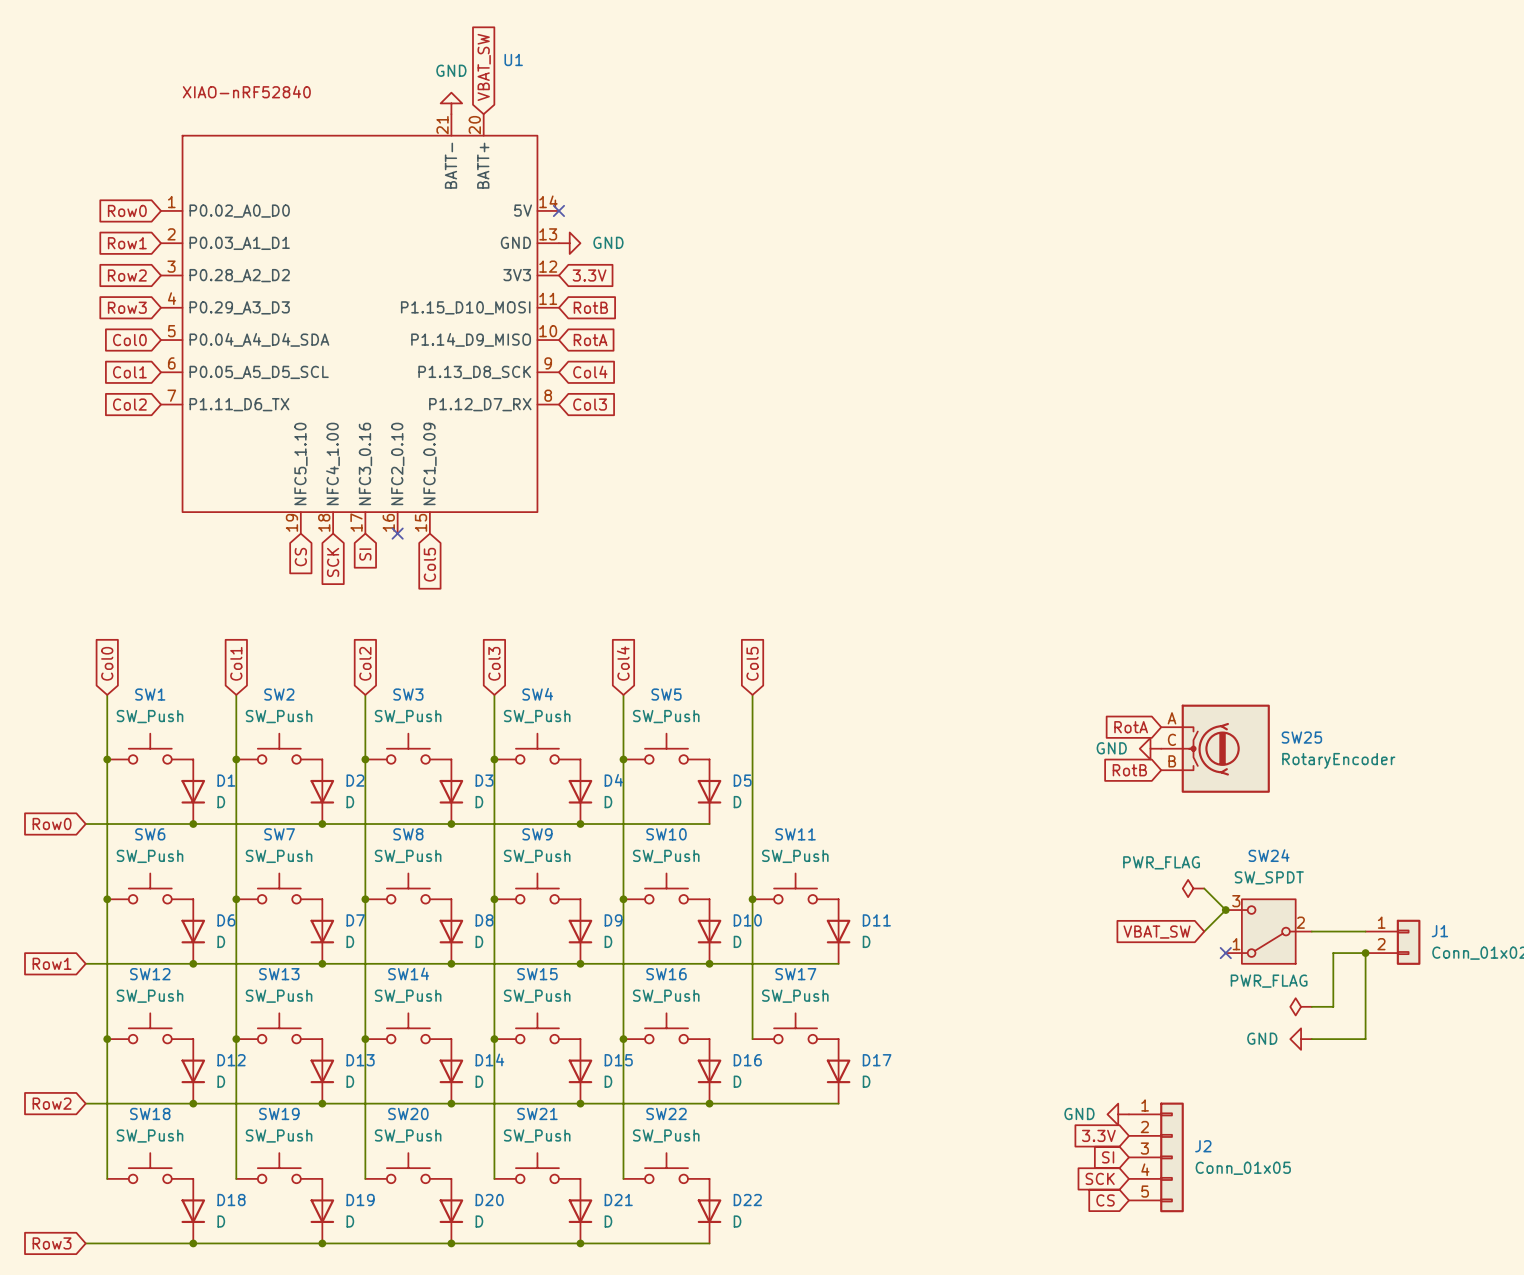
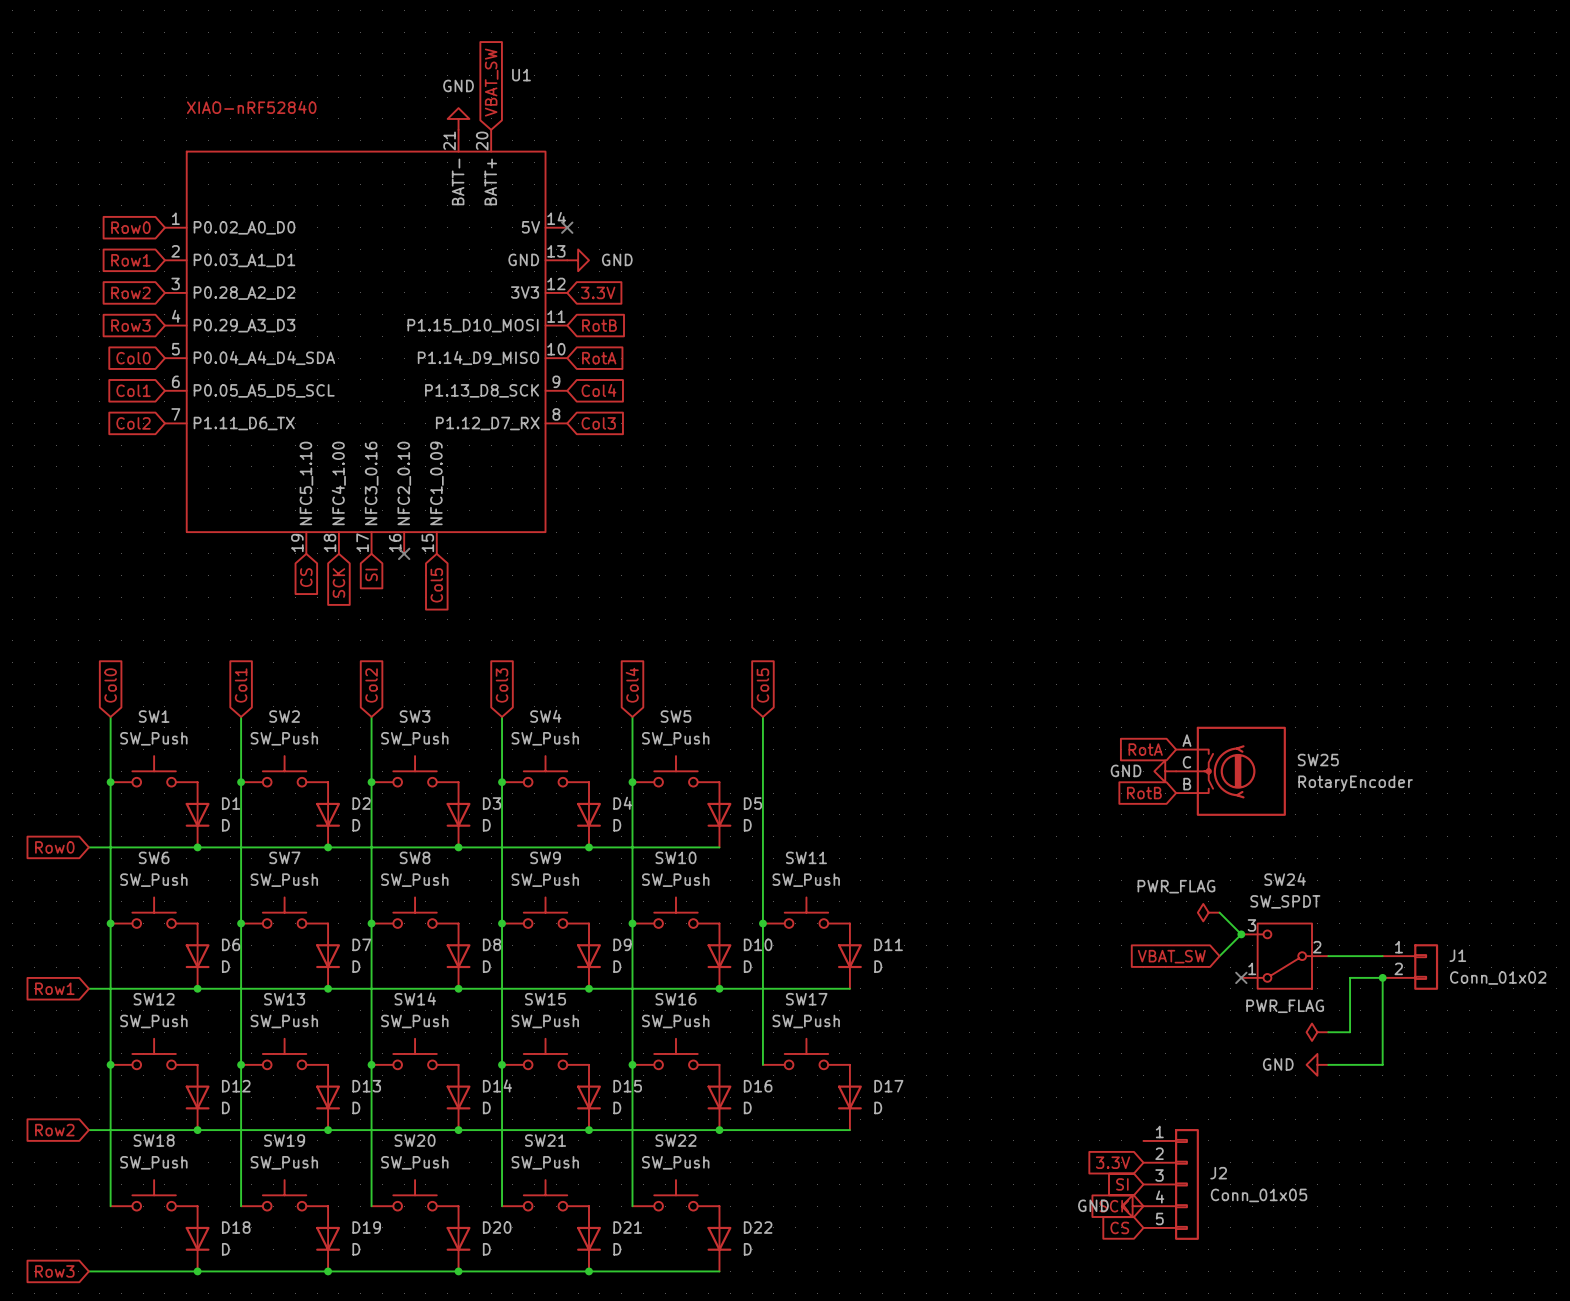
power symbol position: GND (1118, 1114) -> GND (1132, 1206)

